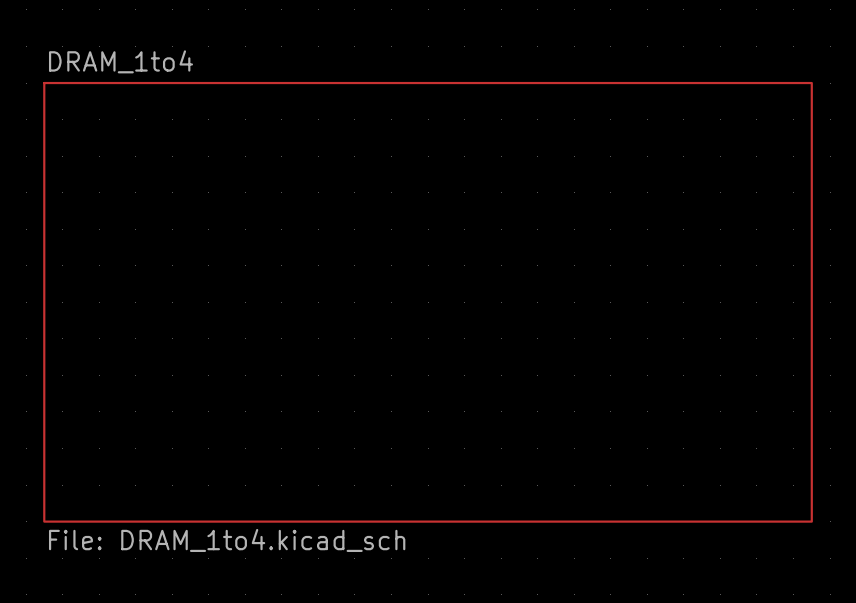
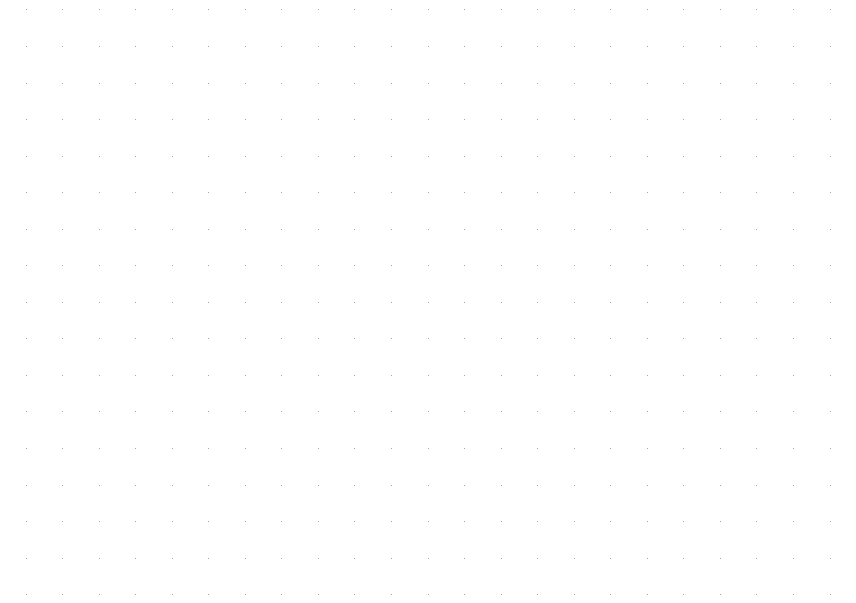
sheet DRAM_1to4: File: DRAM_1to4.kicad_sch (428, 302) -> none

